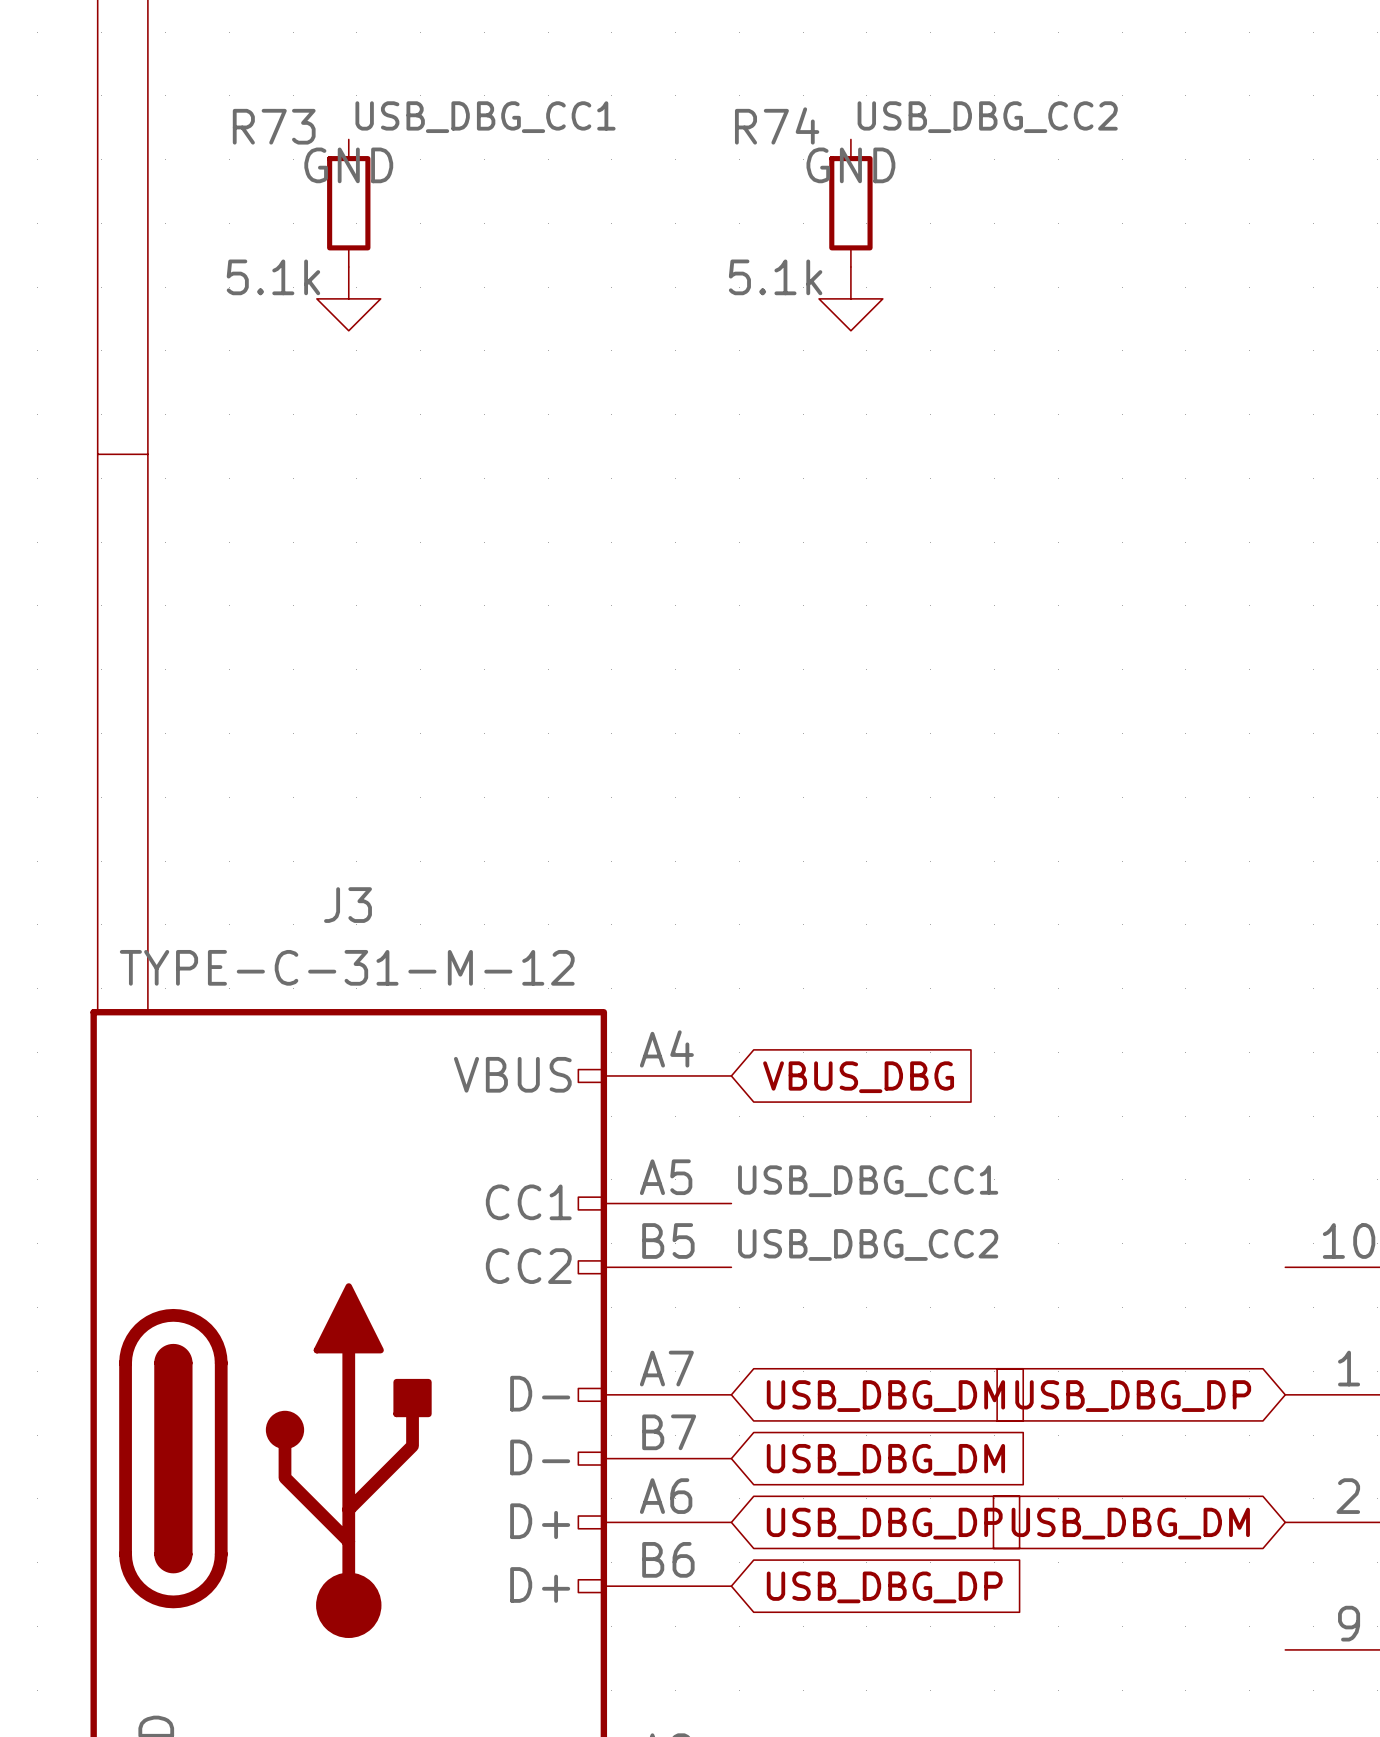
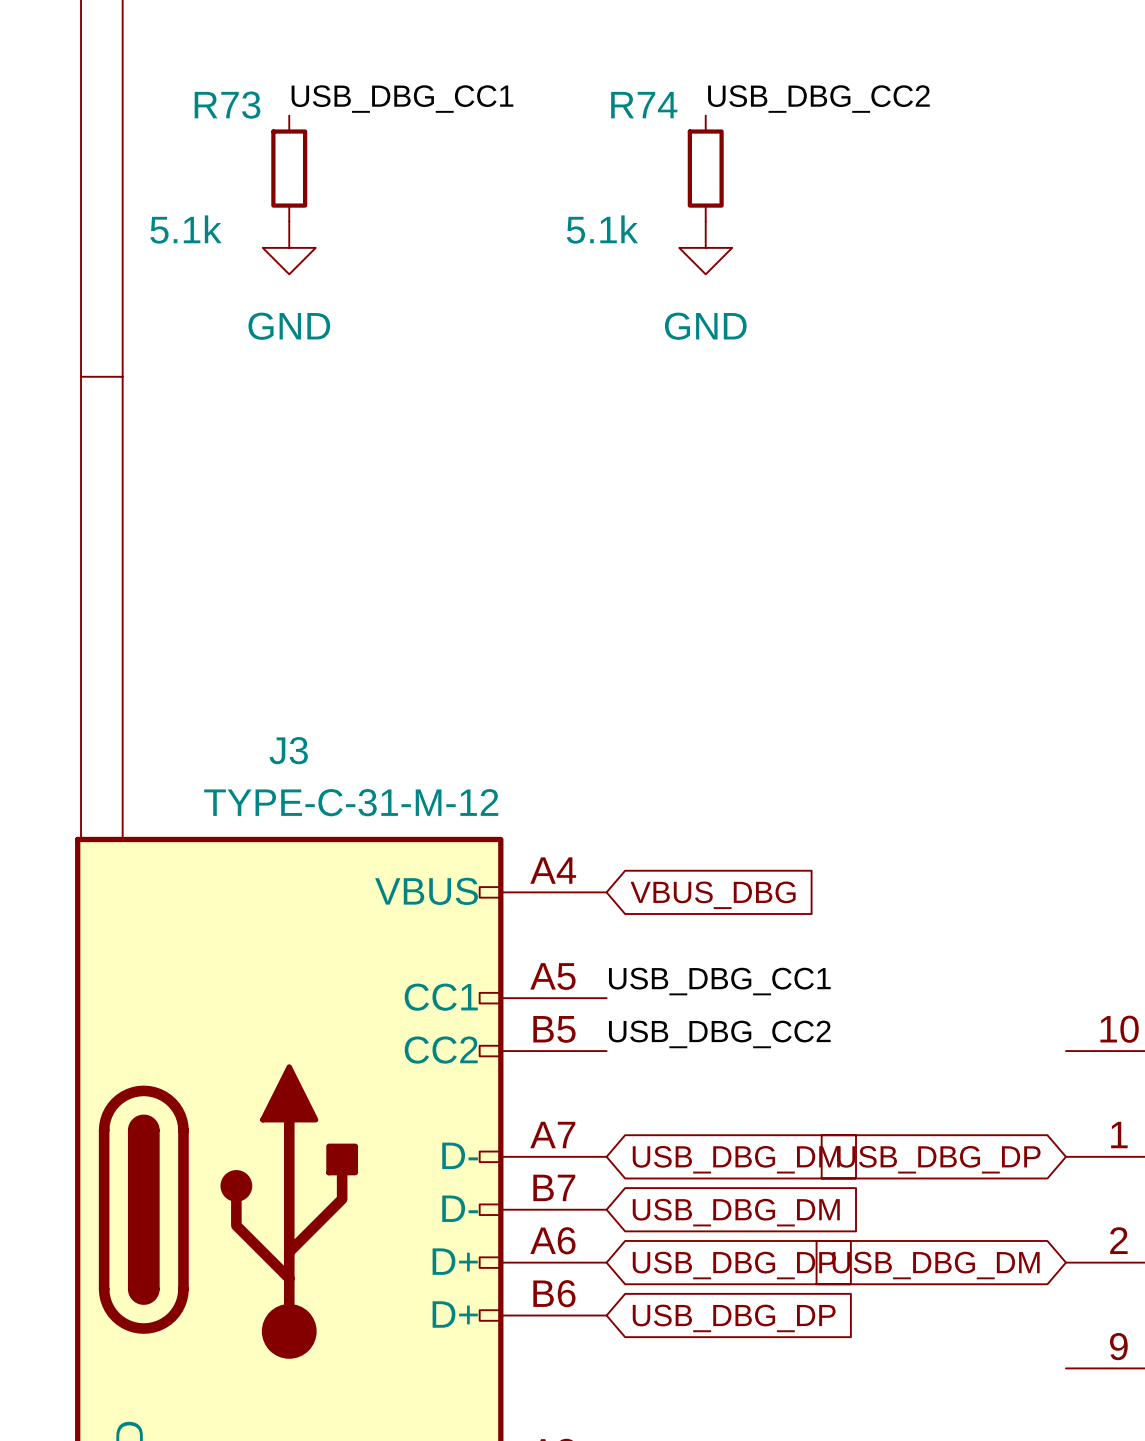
power symbol text position: GND (348, 165) -> GND (289, 326)
power symbol text position: GND (850, 165) -> GND (705, 326)
R73 value position: 5.1k (273, 277) -> 5.1k (185, 229)
R74 value position: 5.1k (775, 277) -> 5.1k (602, 229)
J3 value position: TYPE-C-31-M-12 (347, 967) -> TYPE-C-31-M-12 (351, 802)

